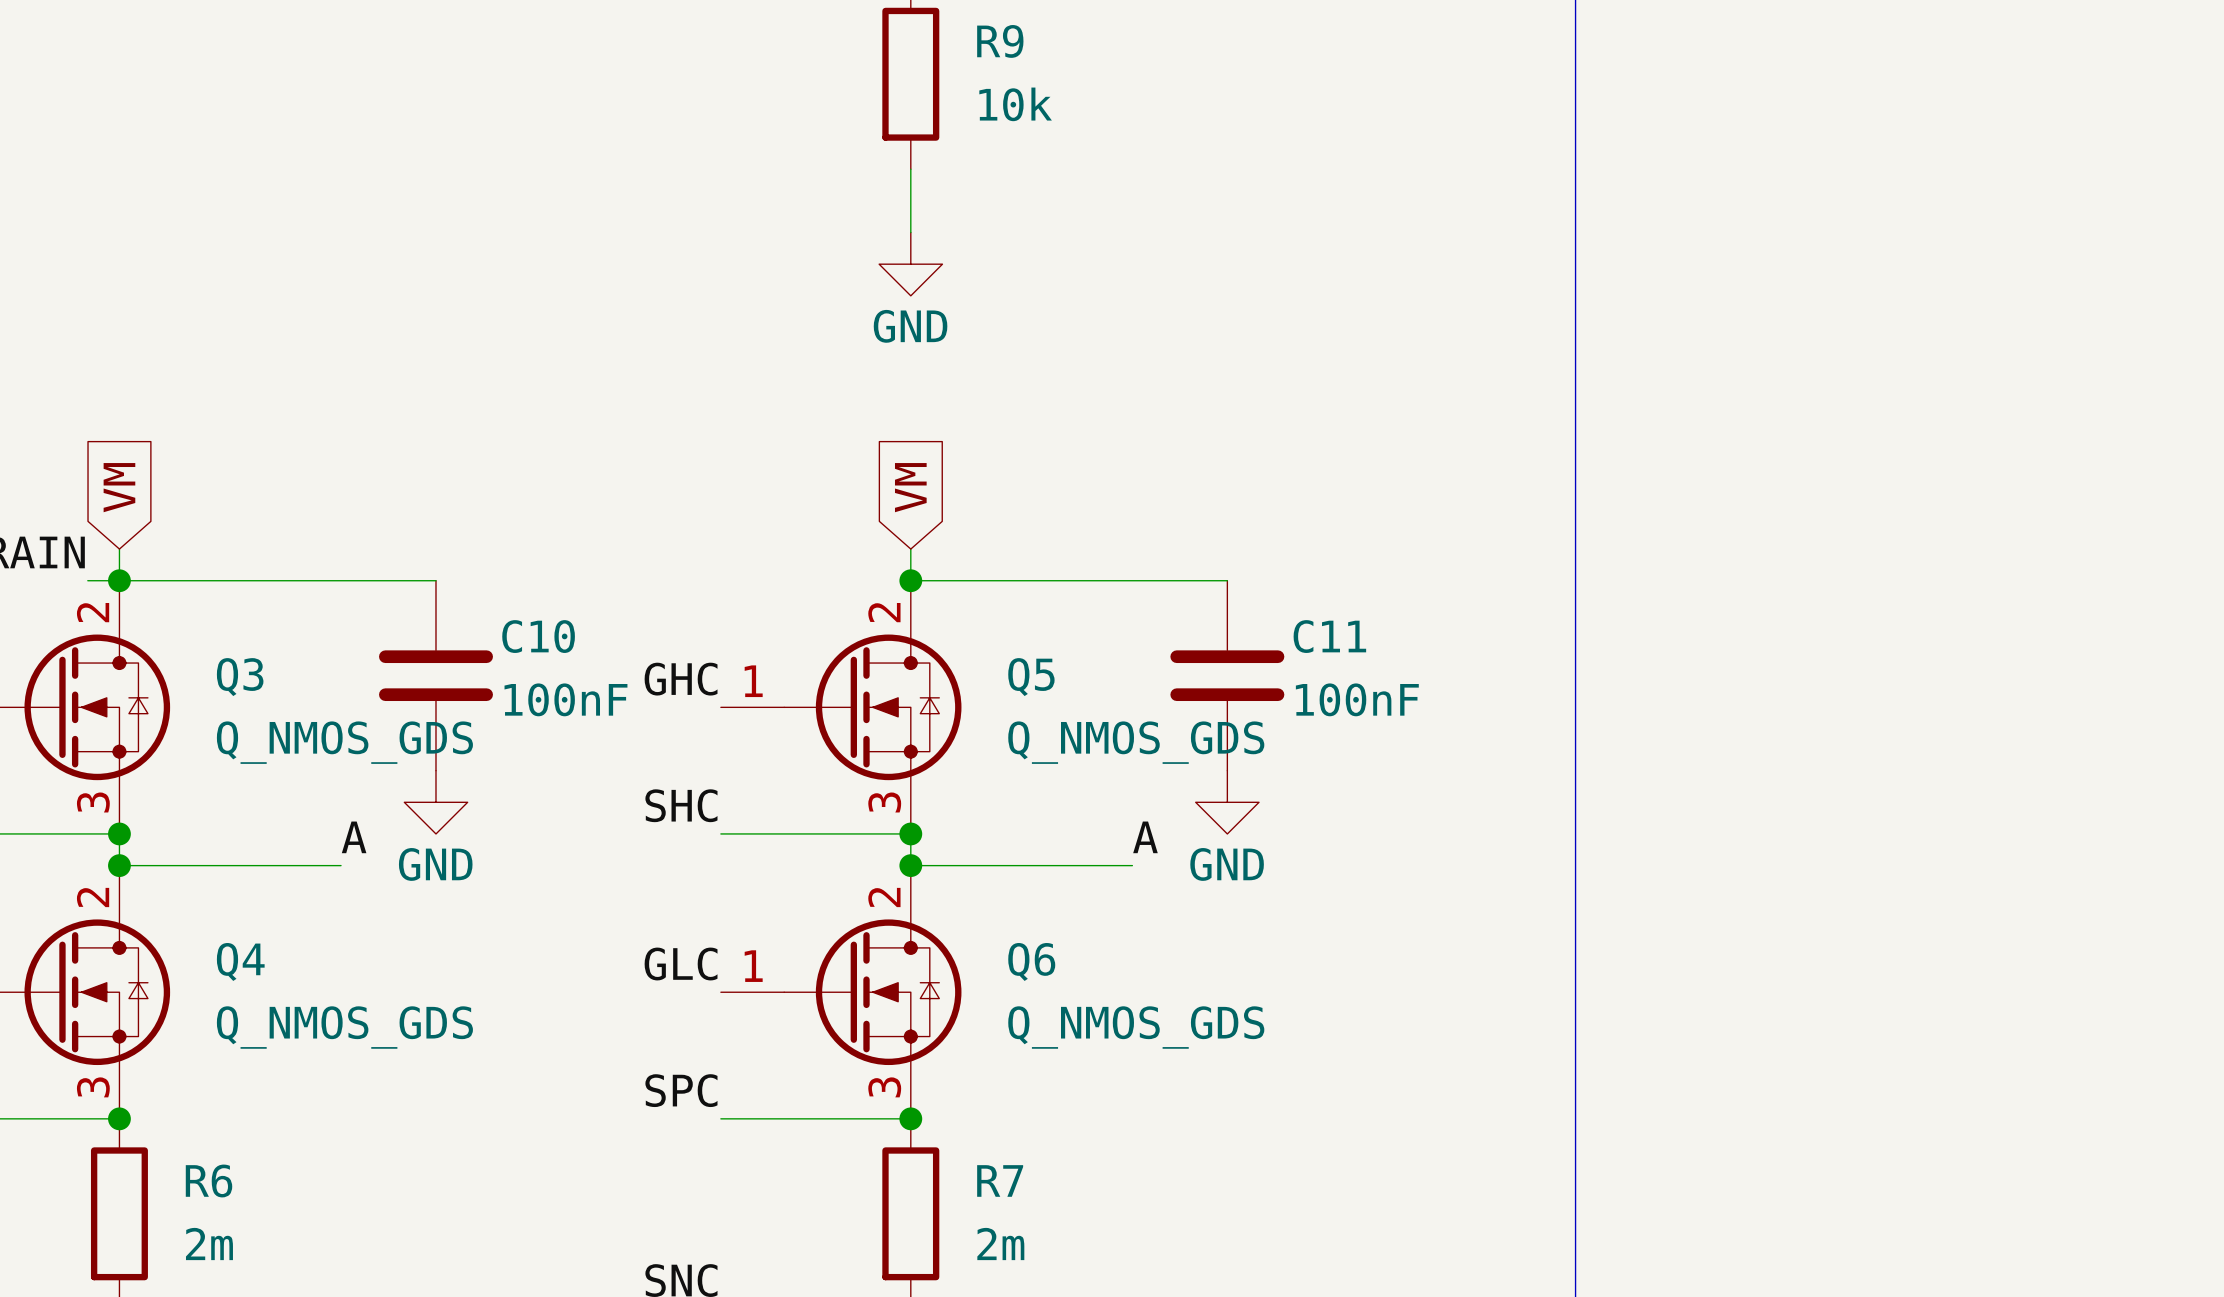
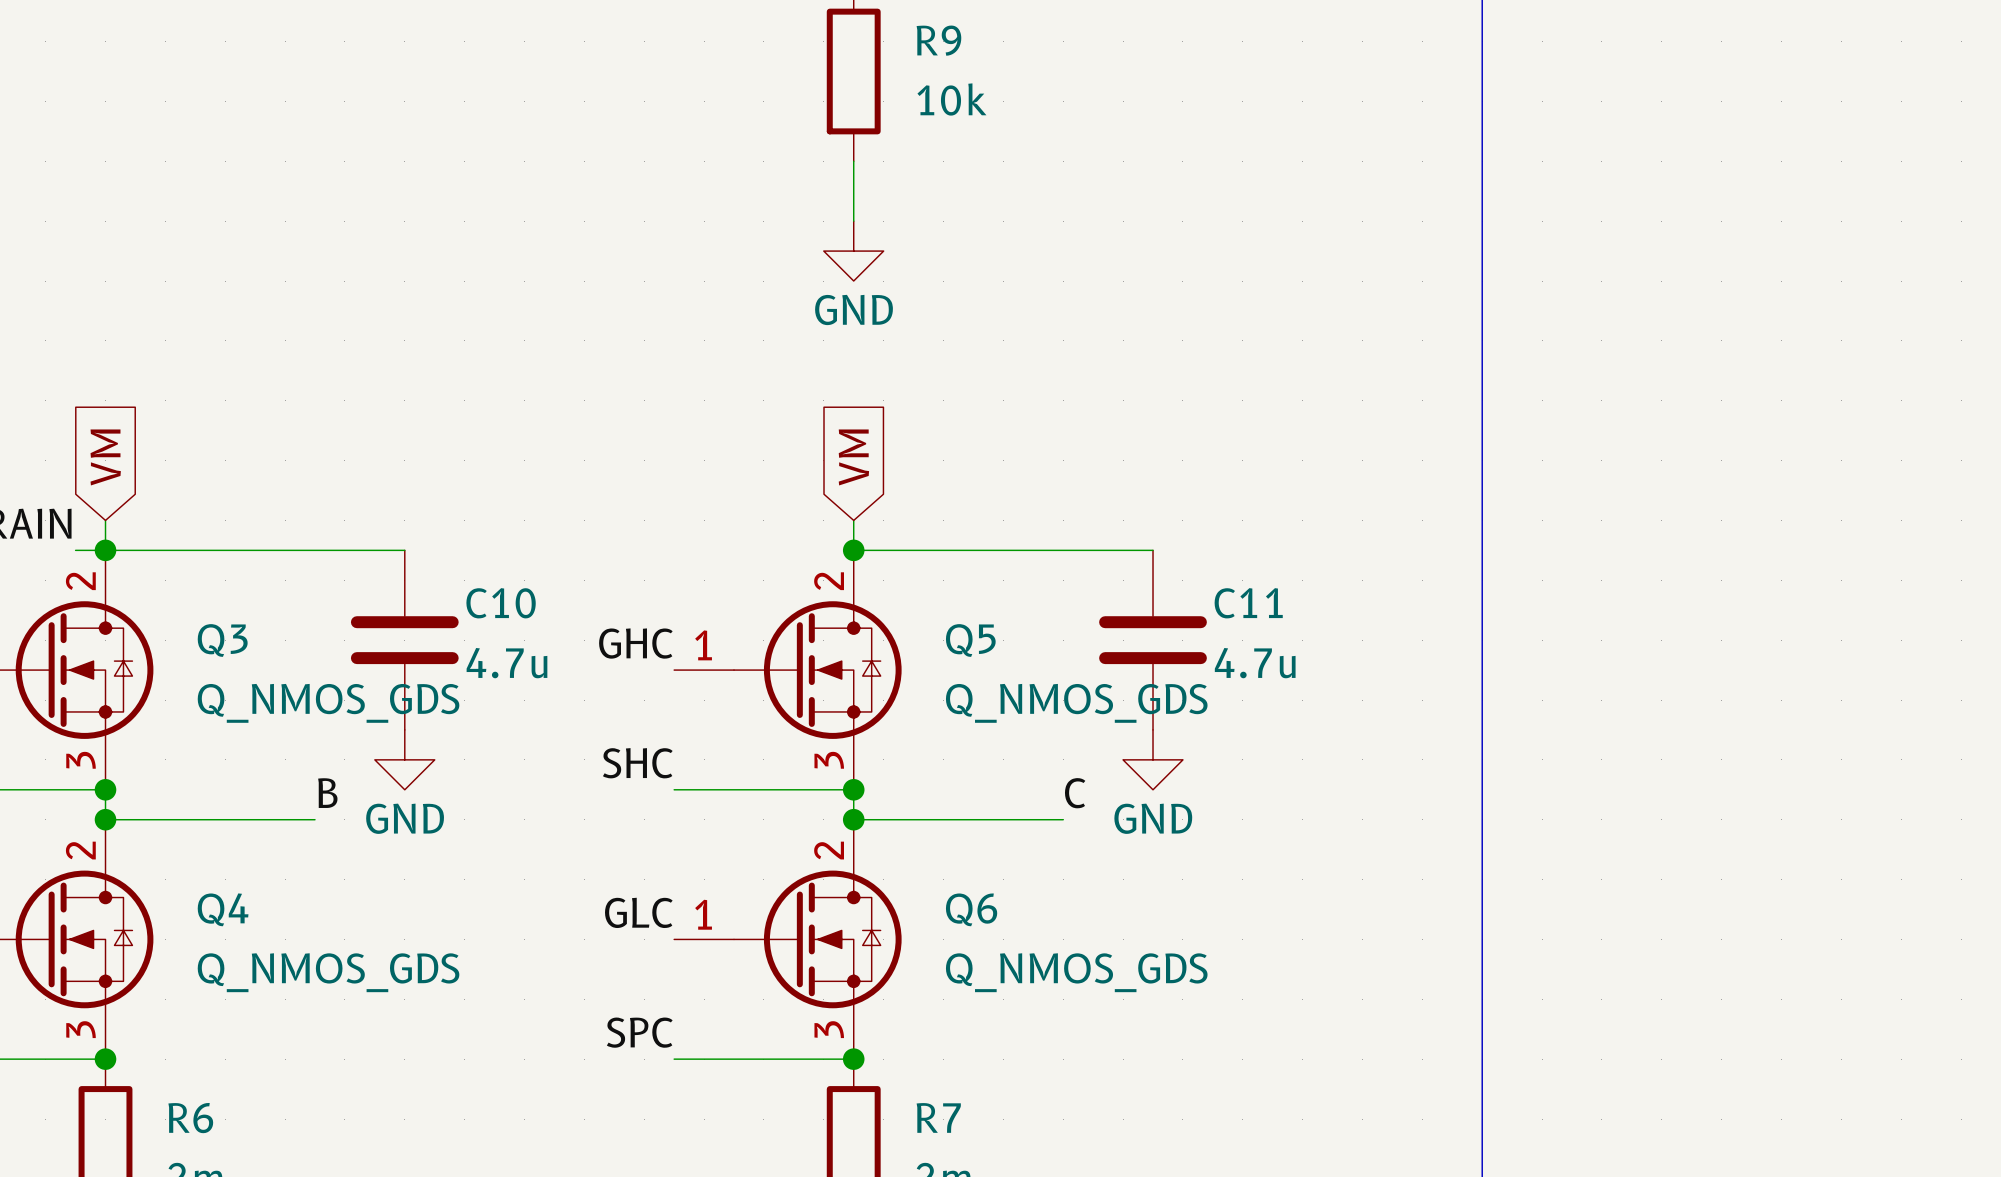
C10 value: 100nF (565, 699) -> 4.7u (506, 663)
C11 value: 100nF (1357, 699) -> 4.7u (1255, 663)
label: A (354, 837) -> B (327, 793)
label: A (1145, 837) -> C (1075, 793)

